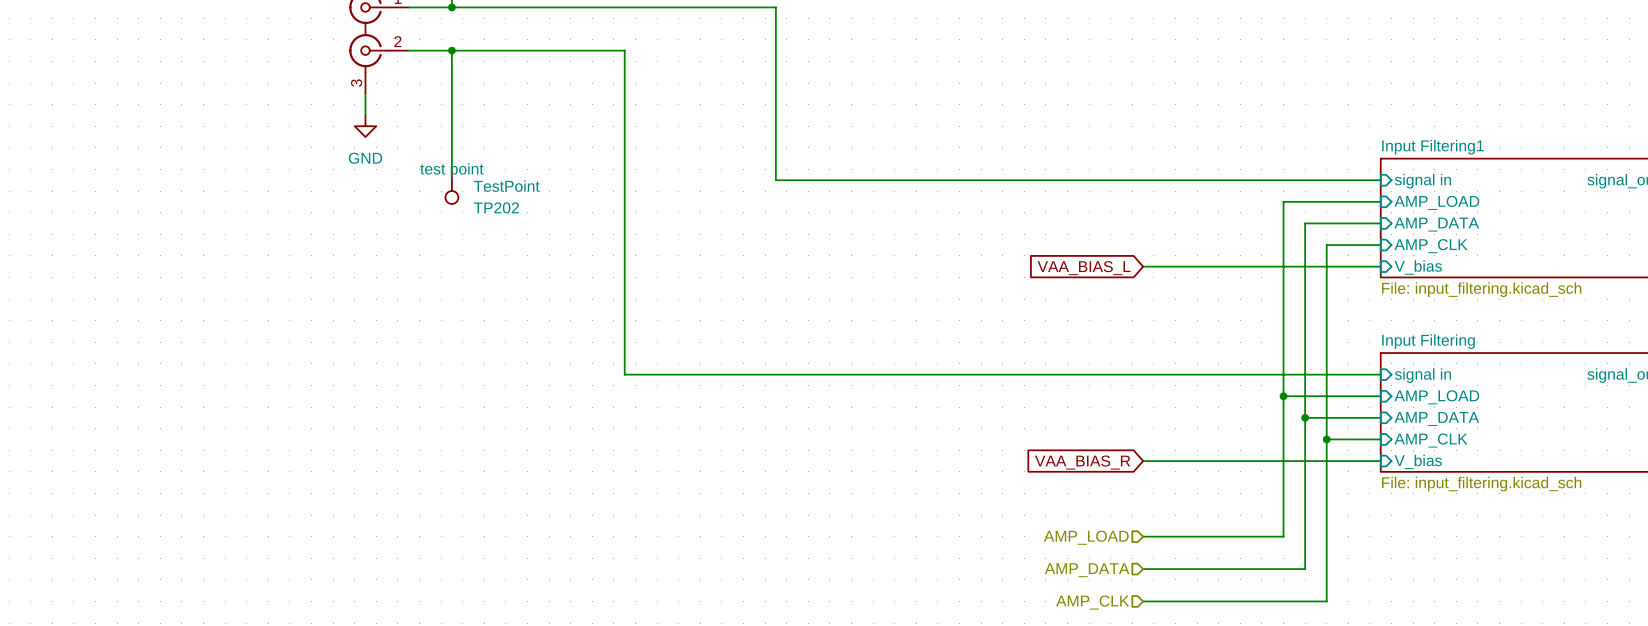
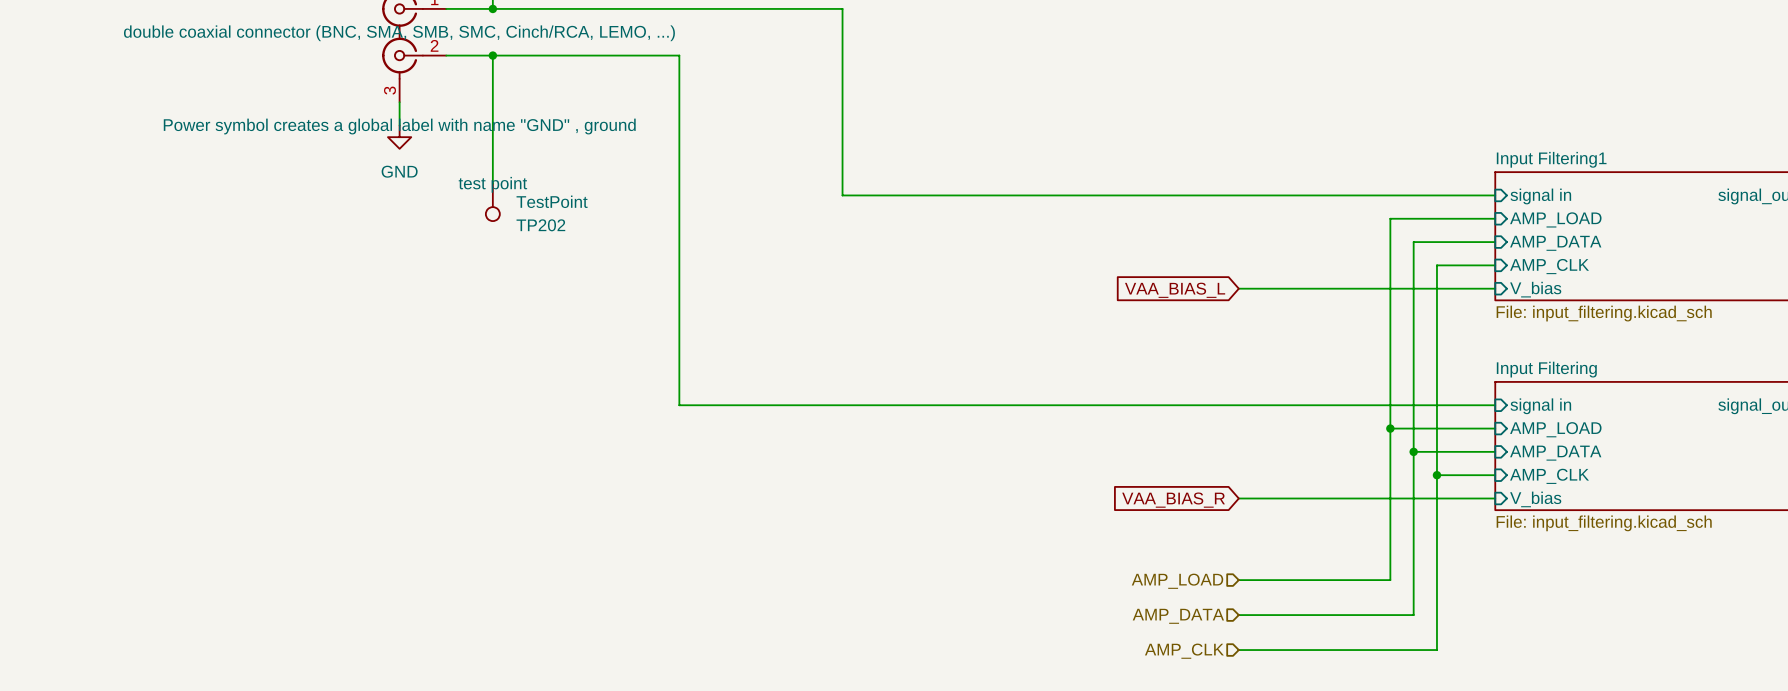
part text: none -> double coaxial connector (BNC, SMA, SMB, SMC, Cinch/RCA, LEMO, ...) (399, 33)
power symbol text: none -> Power symbol creates a global label with name "GND" , ground (399, 126)

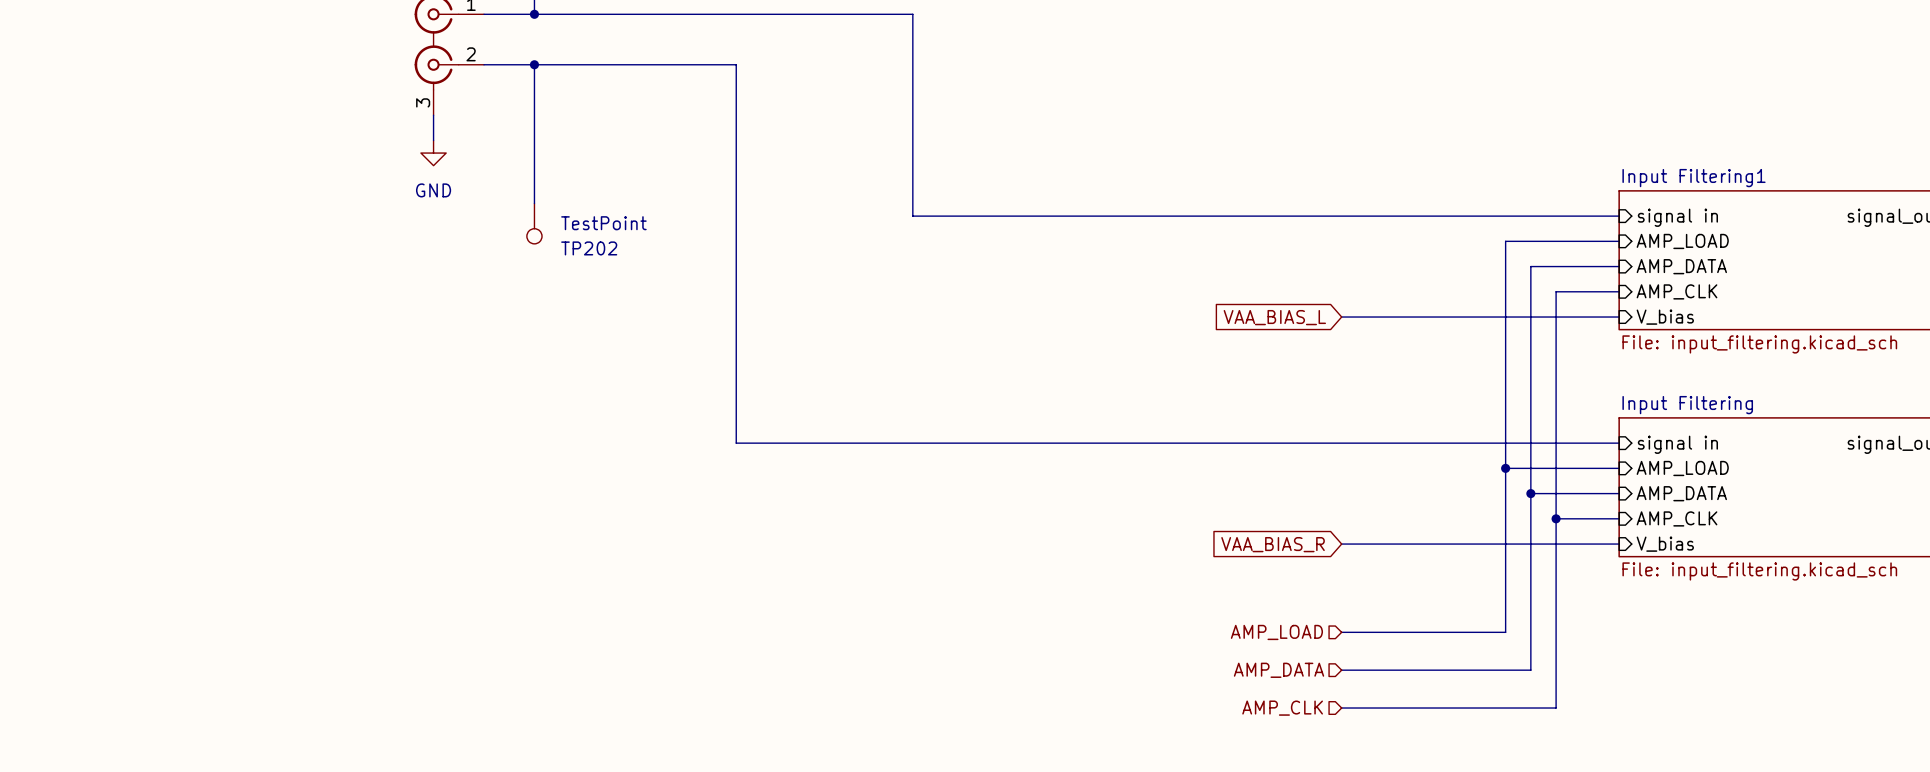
part text: double coaxial connector (BNC, SMA, SMB, SMC, Cinch/RCA, LEMO, ...) (399, 33) -> none
power symbol text: Power symbol creates a global label with name "GND" , ground (399, 126) -> none
TP202 text: test point (492, 184) -> none

